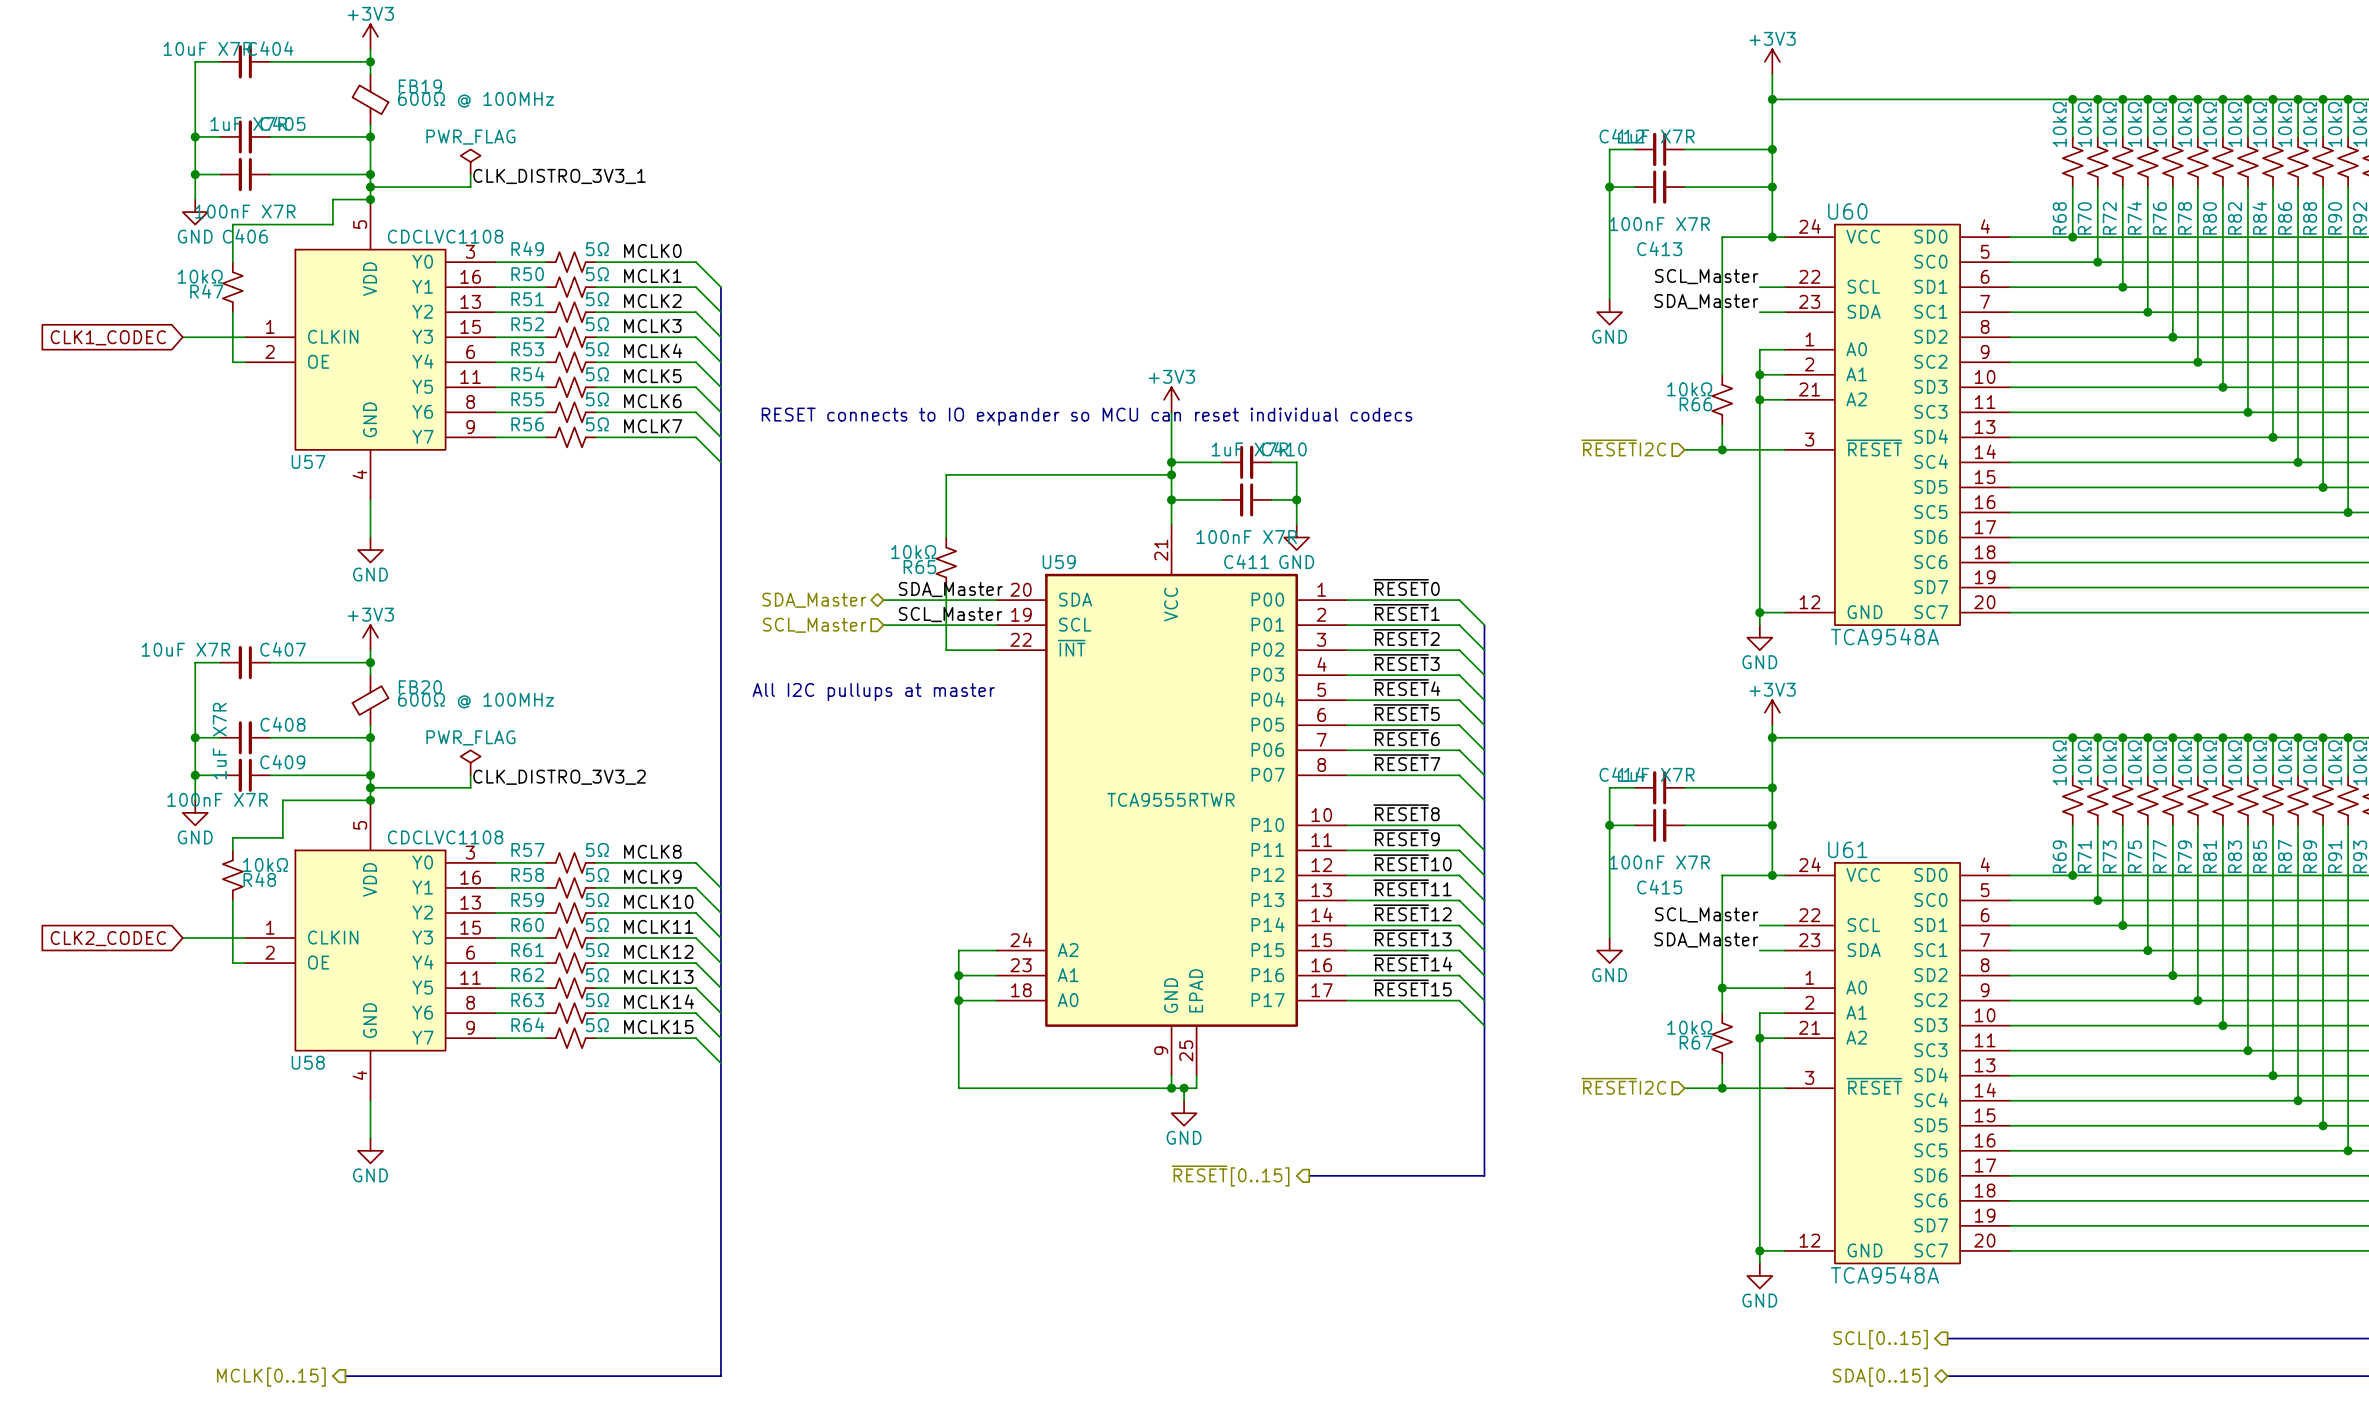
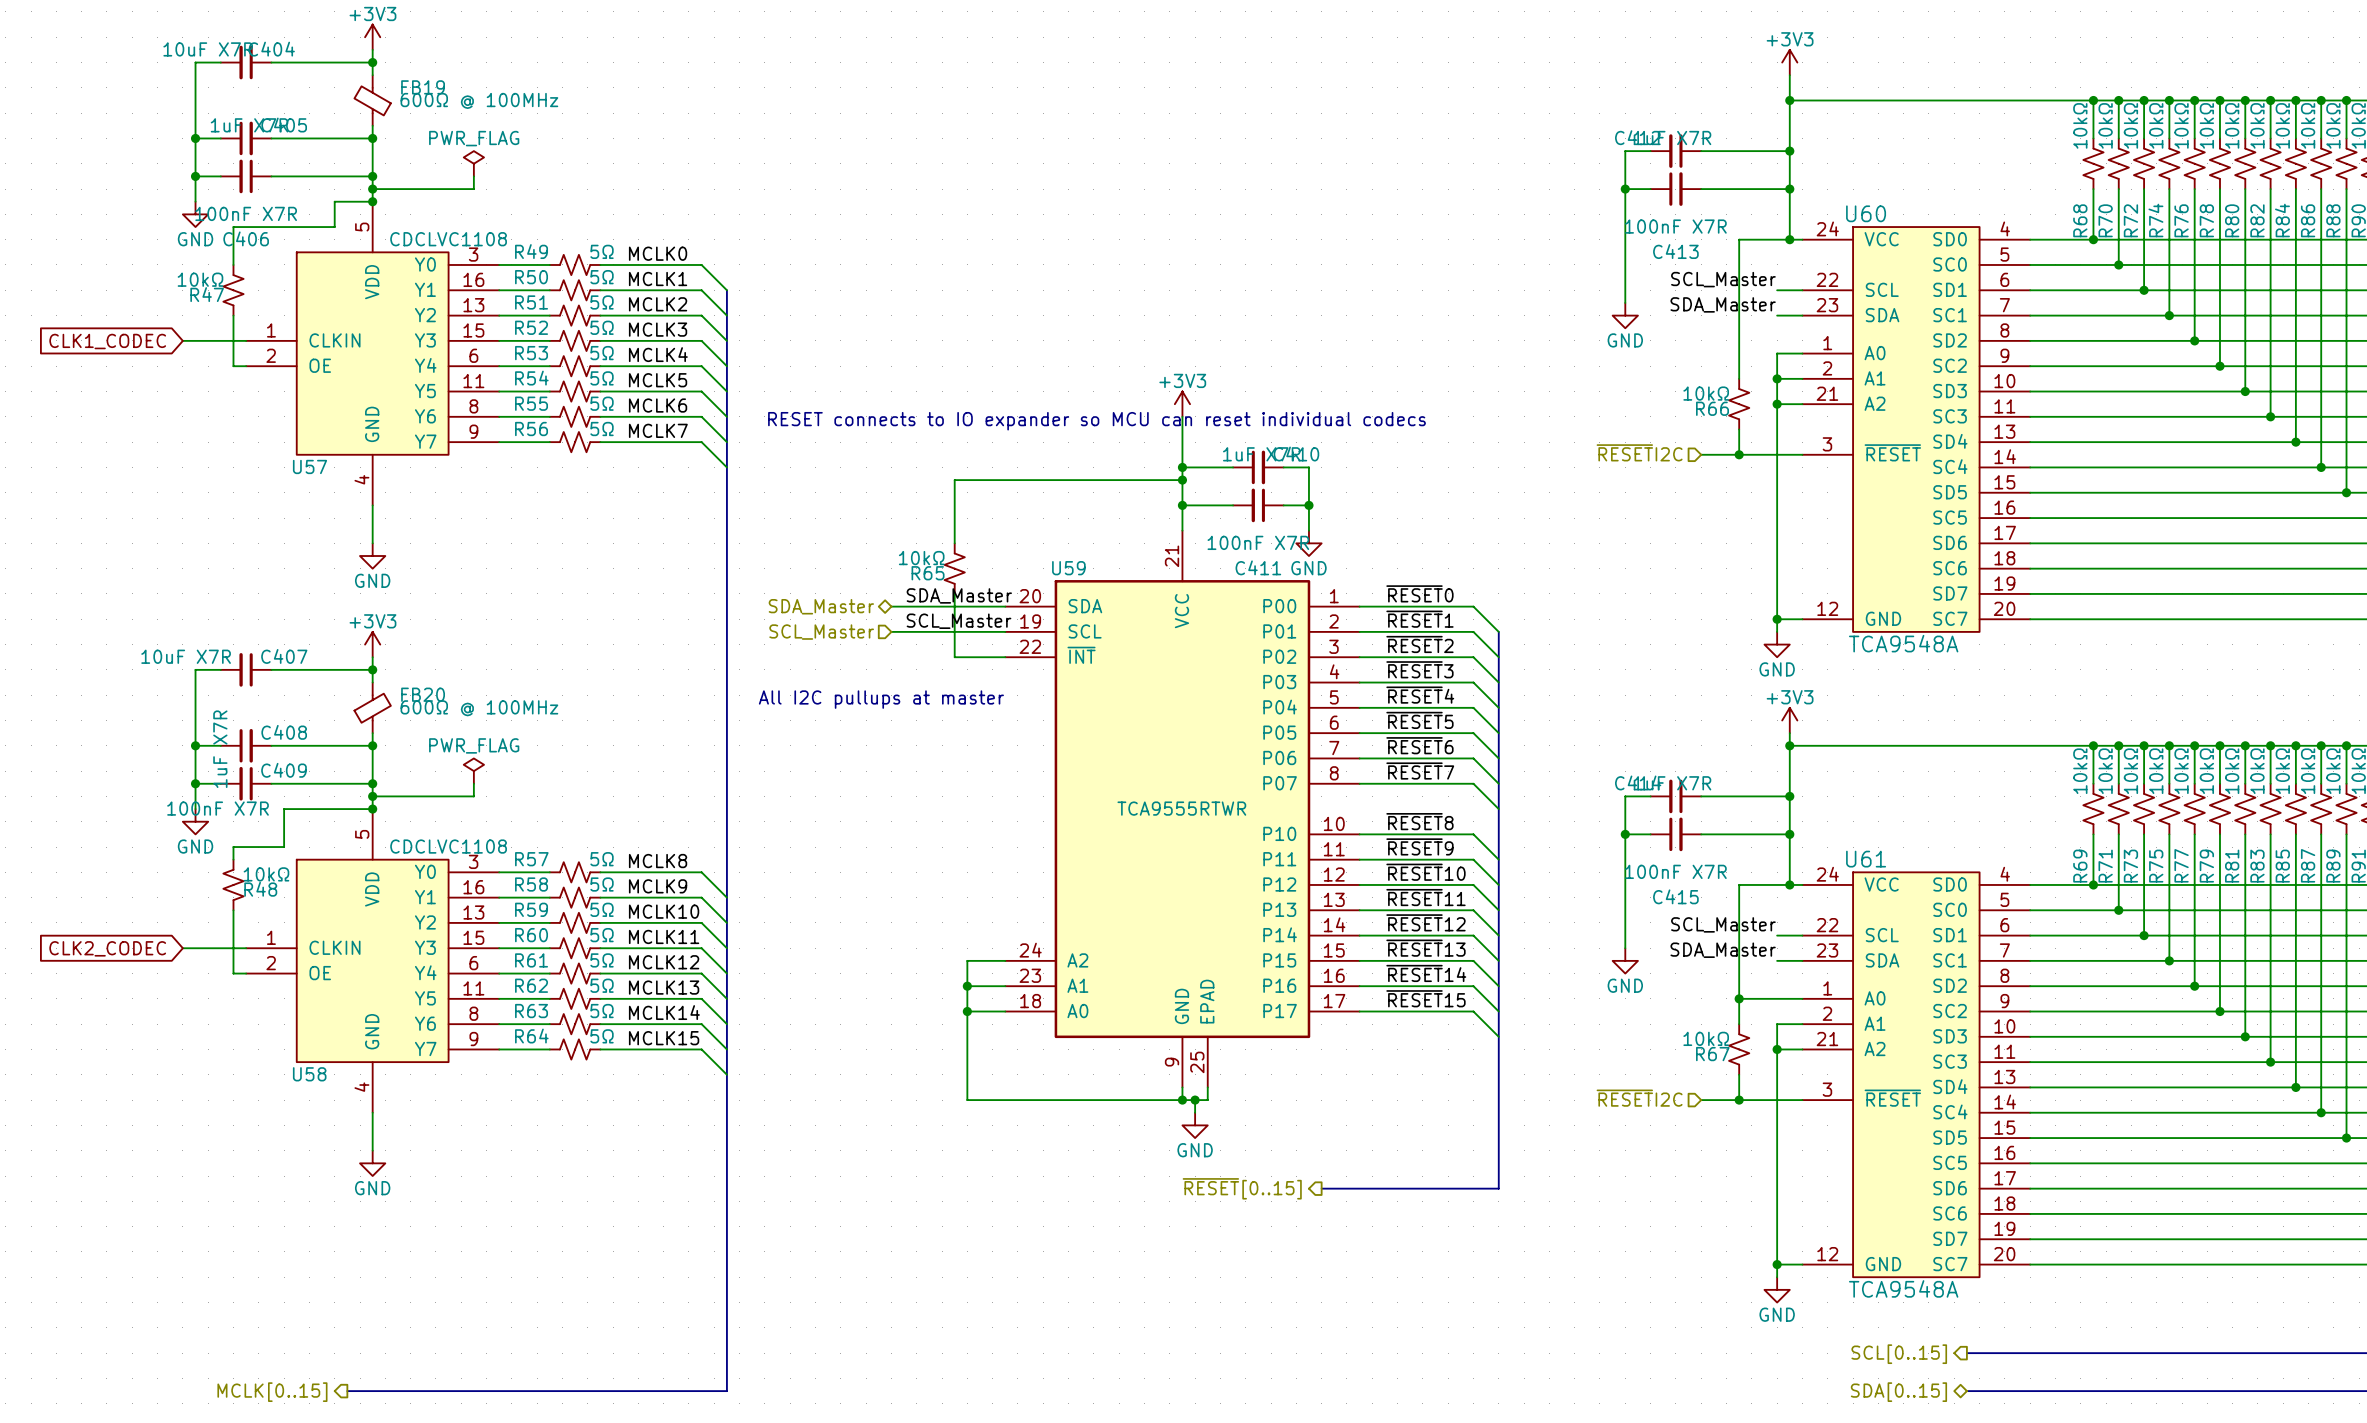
label: CLK_DISTRO_3V3_1 (559, 176) -> none
label: CLK_DISTRO_3V3_2 (559, 777) -> none

